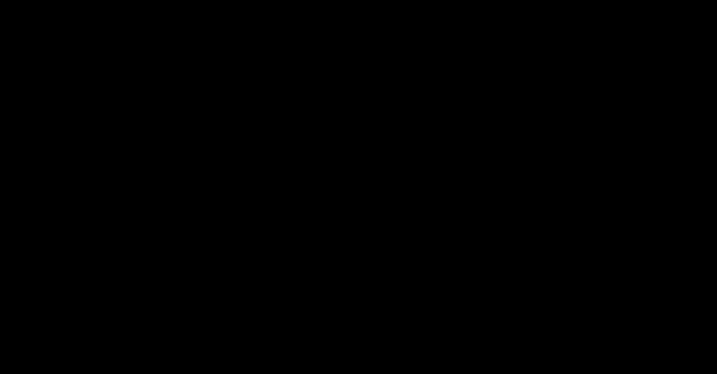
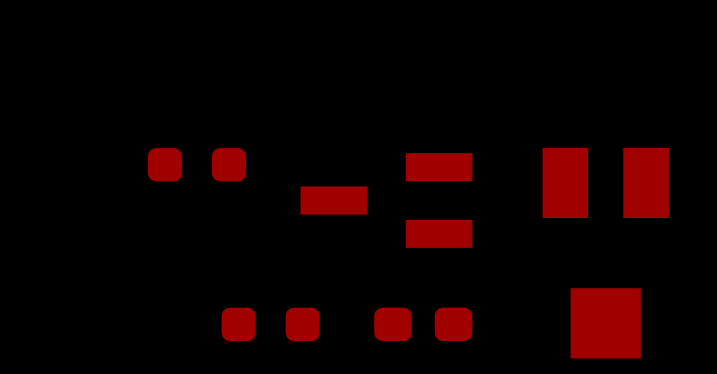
part: none -> (197, 164)
part: none -> (386, 200)
part: none -> (605, 253)
part: none -> (270, 324)
part: none -> (423, 324)

